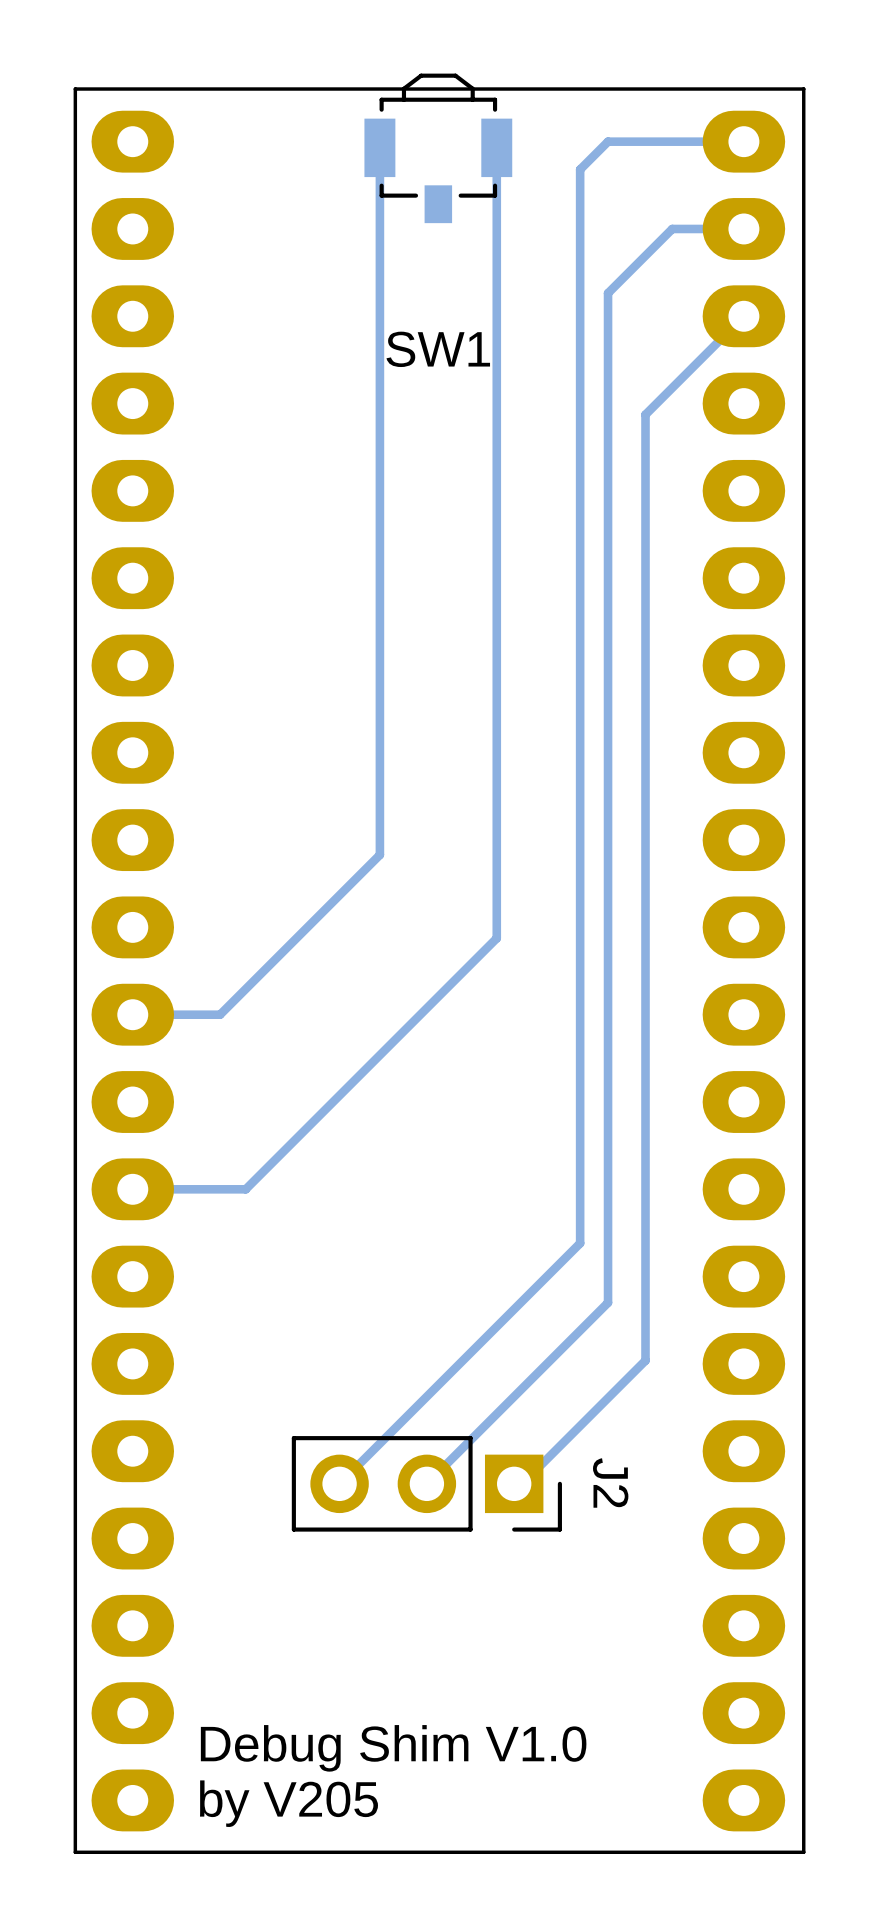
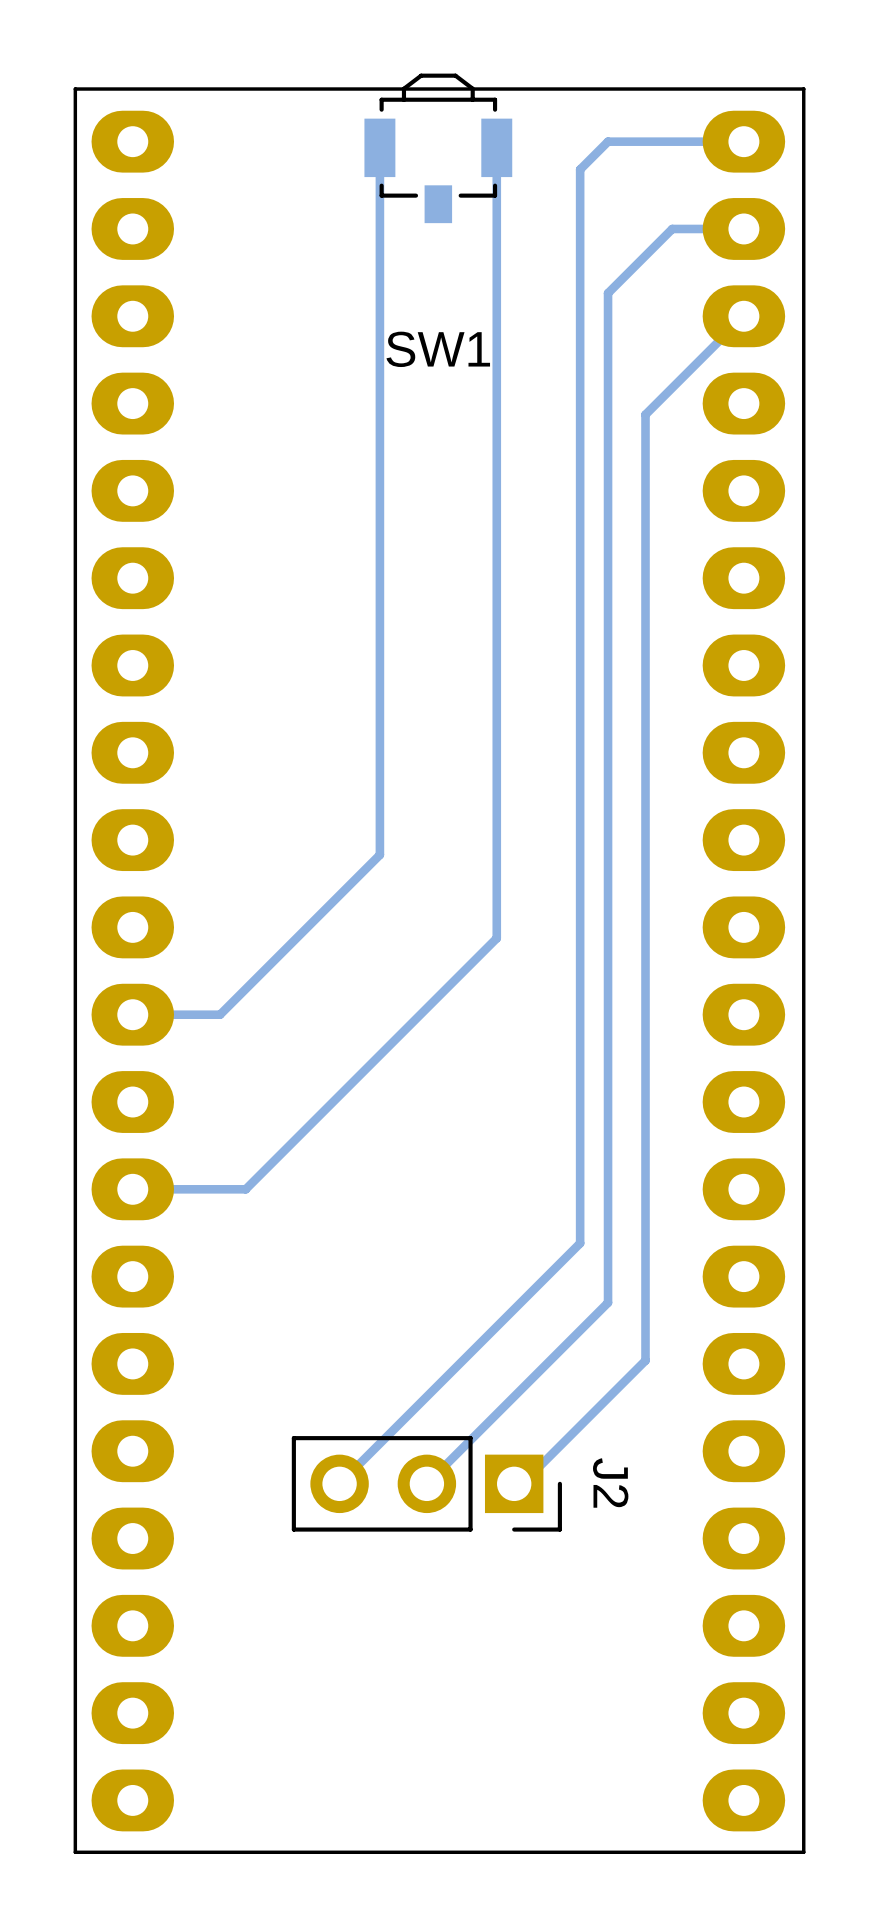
text: Debug Shim V1.0 (393, 1748) -> none
text: by V205 (289, 1803) -> none

